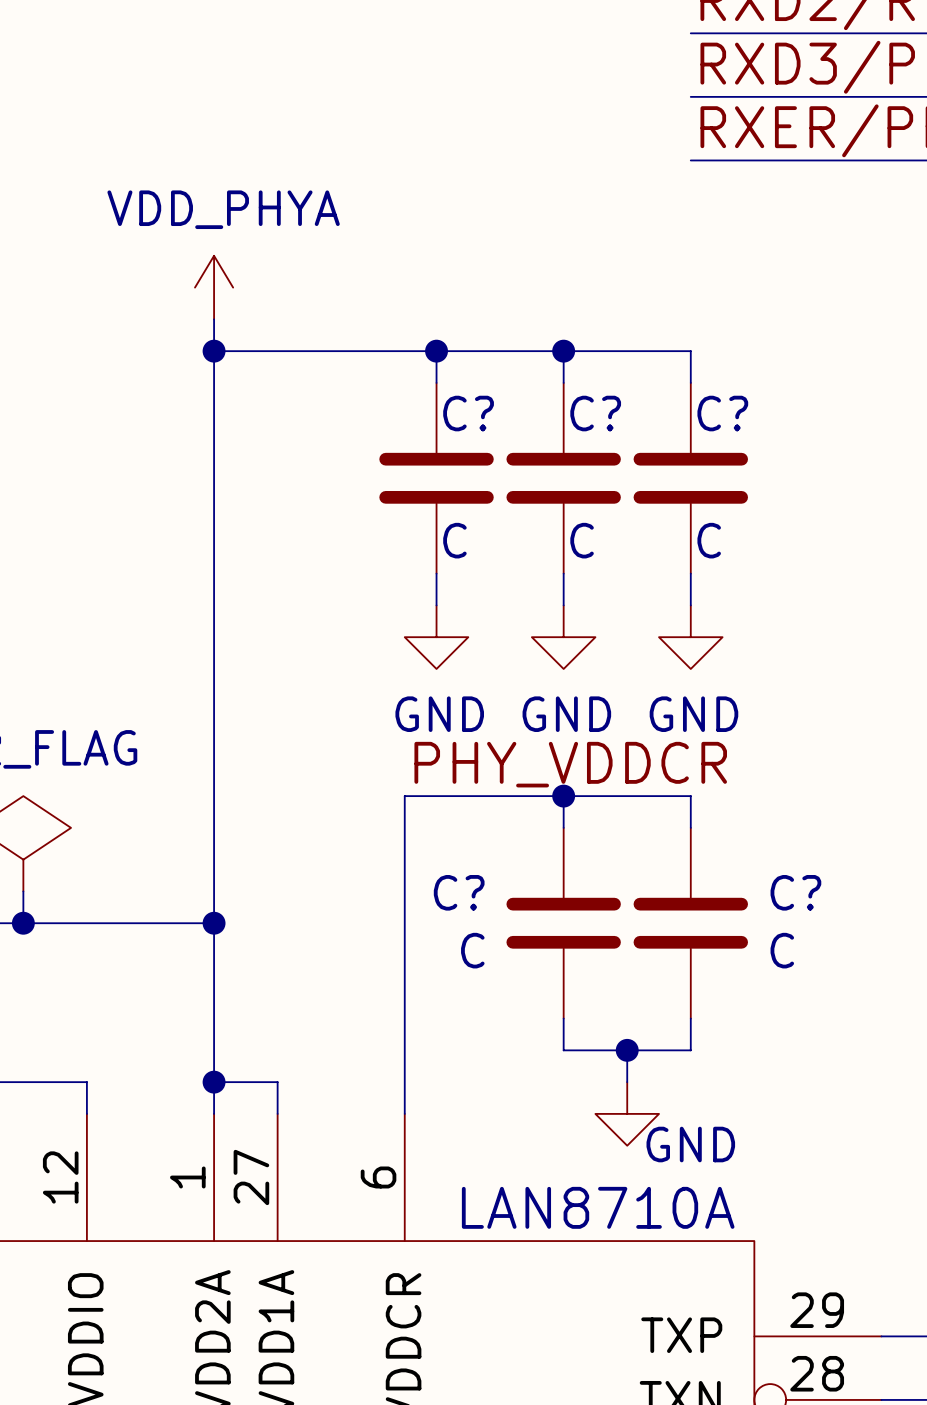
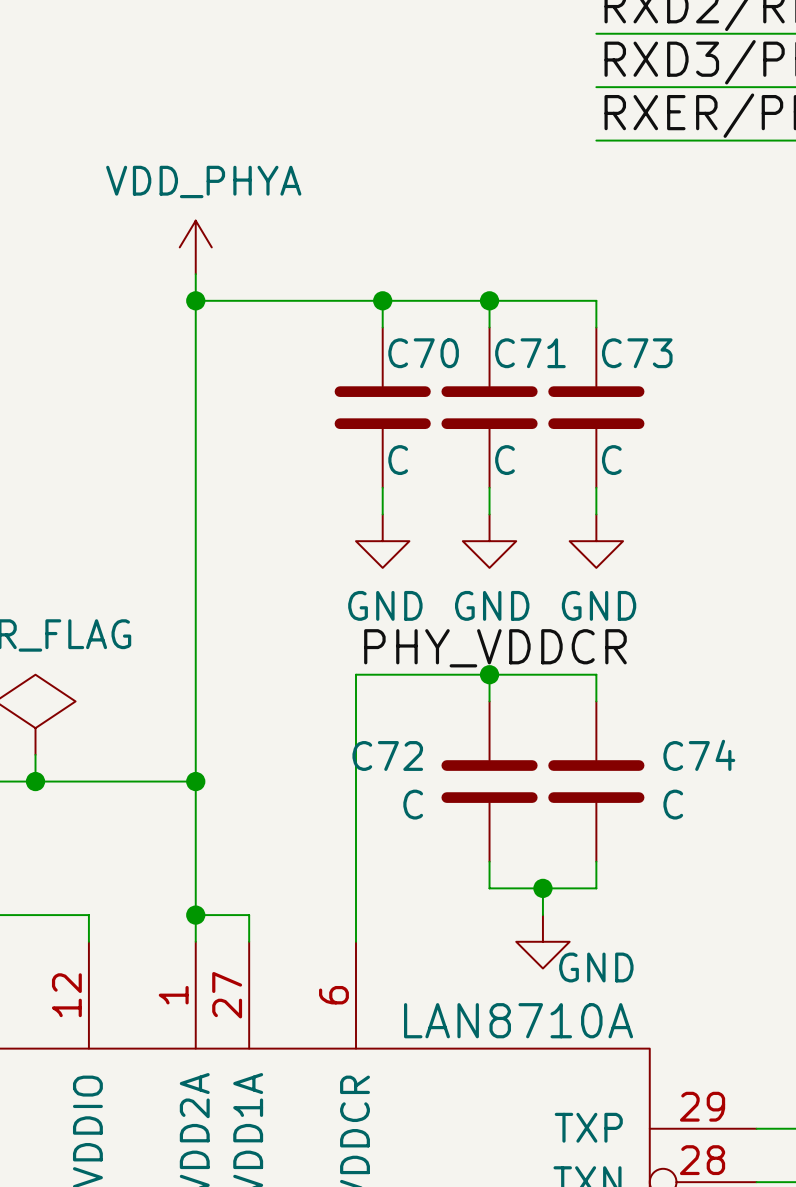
C? name: C? (468, 413) -> C70 (423, 353)
C? name: C? (595, 413) -> C71 (530, 353)
C? name: C? (722, 413) -> C73 (637, 353)
C? name: C? (459, 892) -> C72 (387, 755)
C? name: C? (795, 892) -> C74 (699, 755)

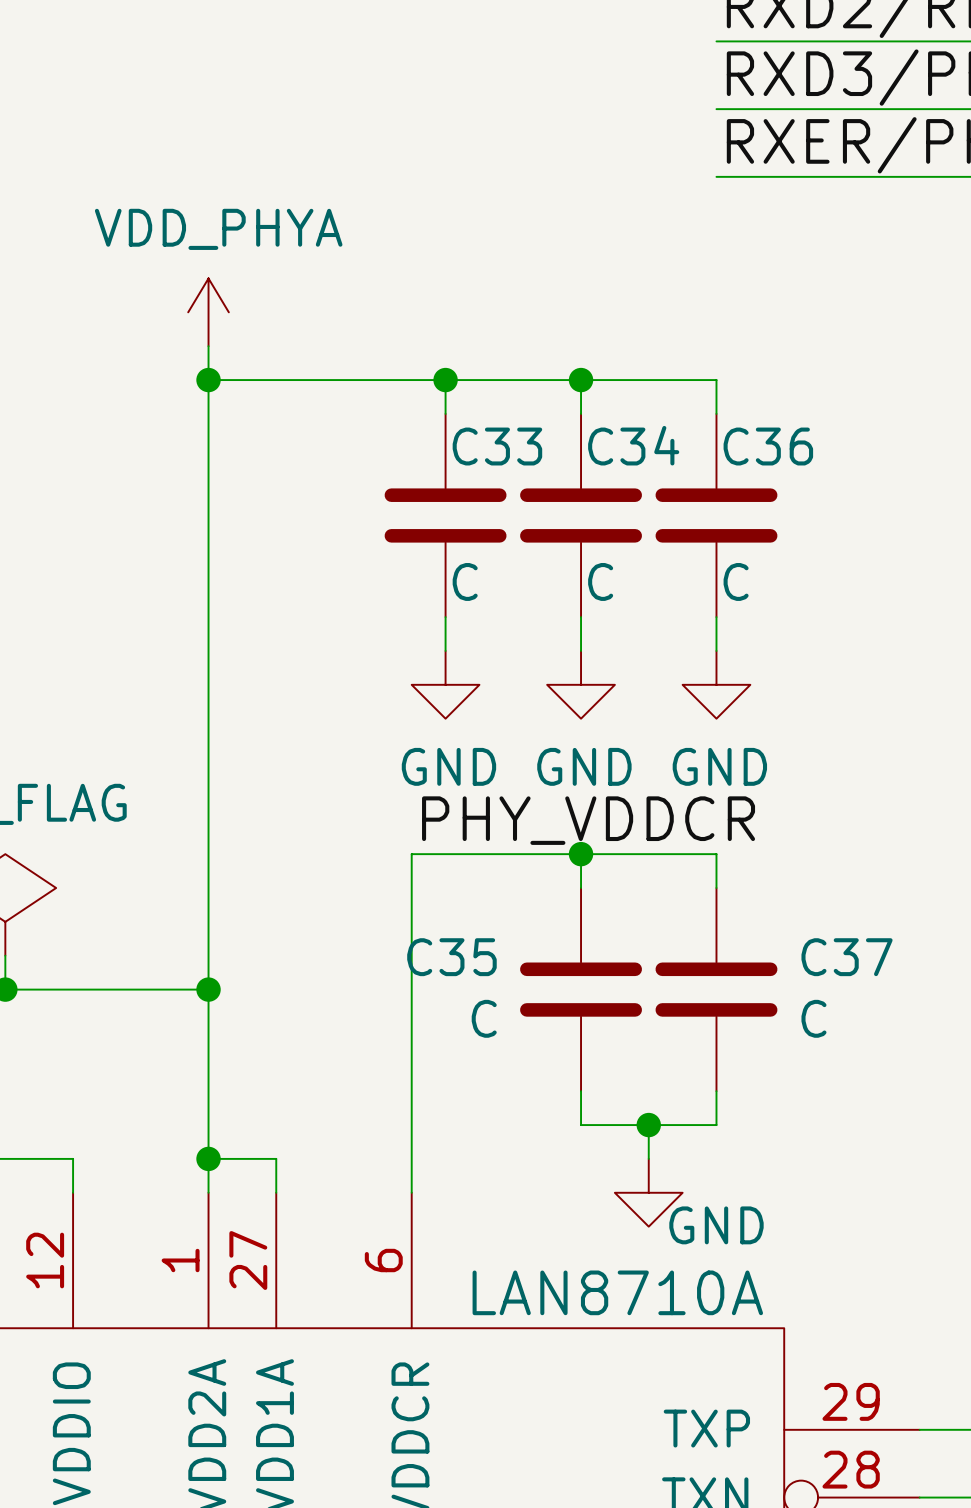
C70 name: C70 (423, 353) -> C33 (497, 446)
C71 name: C71 (530, 353) -> C34 (633, 445)
C73 name: C73 (637, 353) -> C36 (768, 446)
C72 name: C72 (387, 755) -> C35 (451, 957)
C74 name: C74 (699, 755) -> C37 (847, 957)

